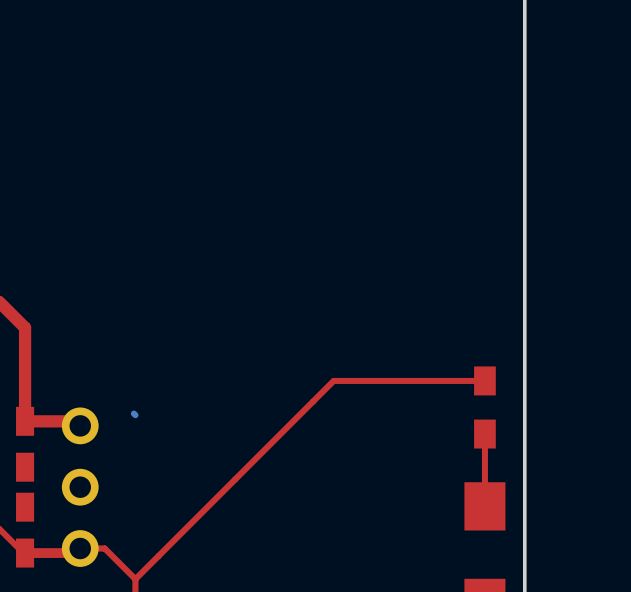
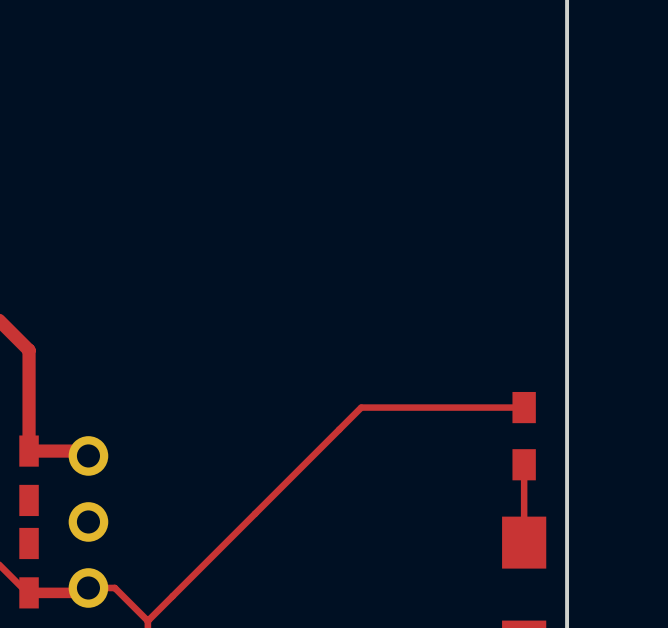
bottom track: (133, 413) (135, 415) -> none

